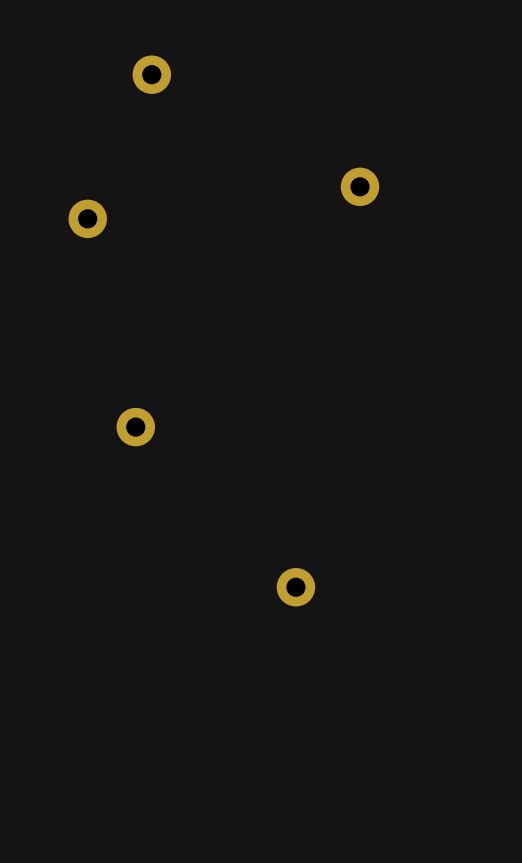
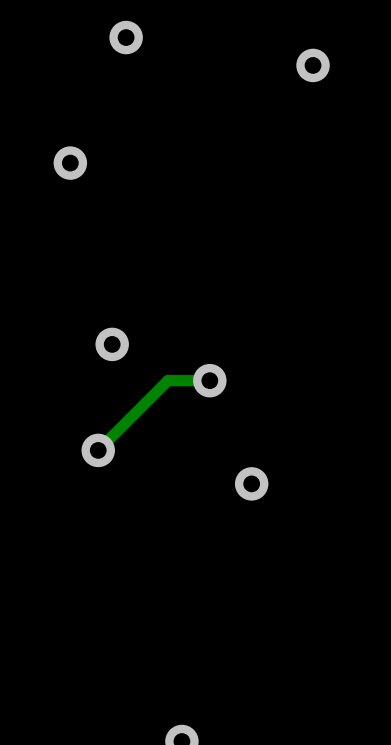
via position: (360, 186) -> (313, 65)
track: none -> (209, 380) (167, 380) (98, 450) (101, 453)
via: none -> (209, 380)
via: none -> (98, 450)

